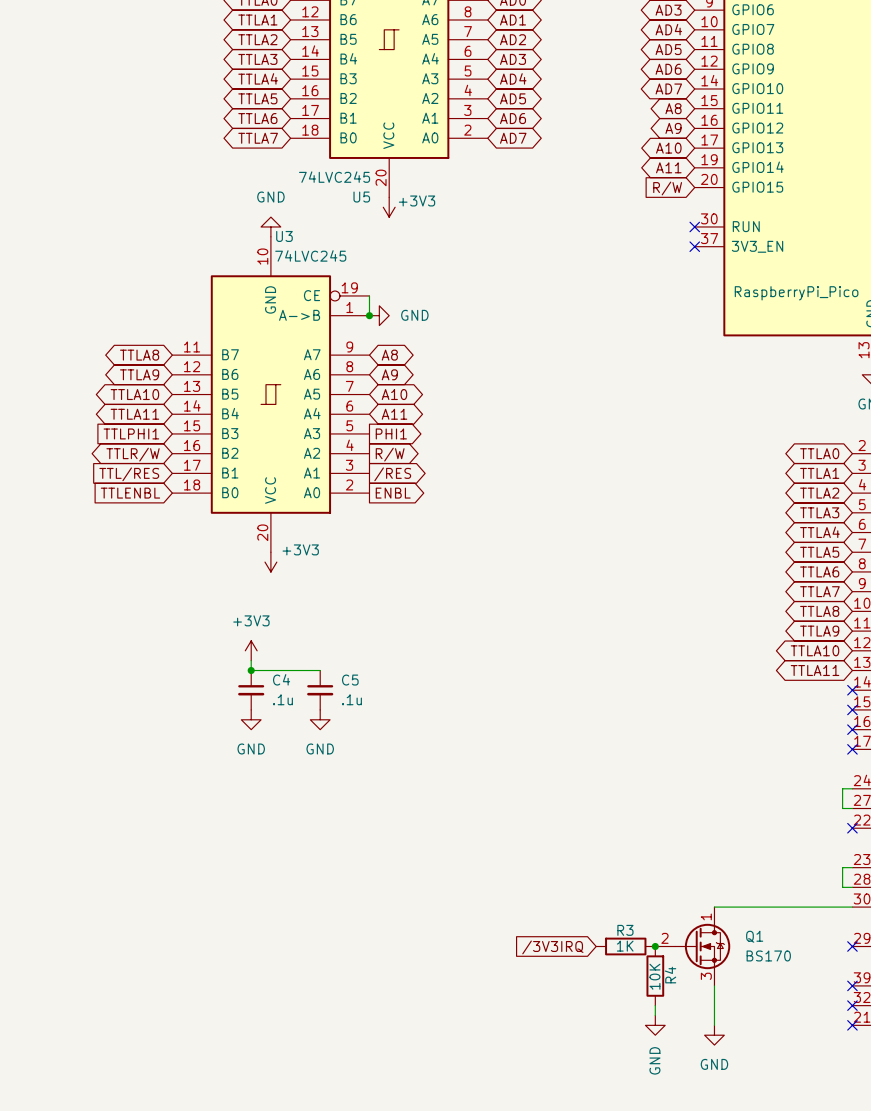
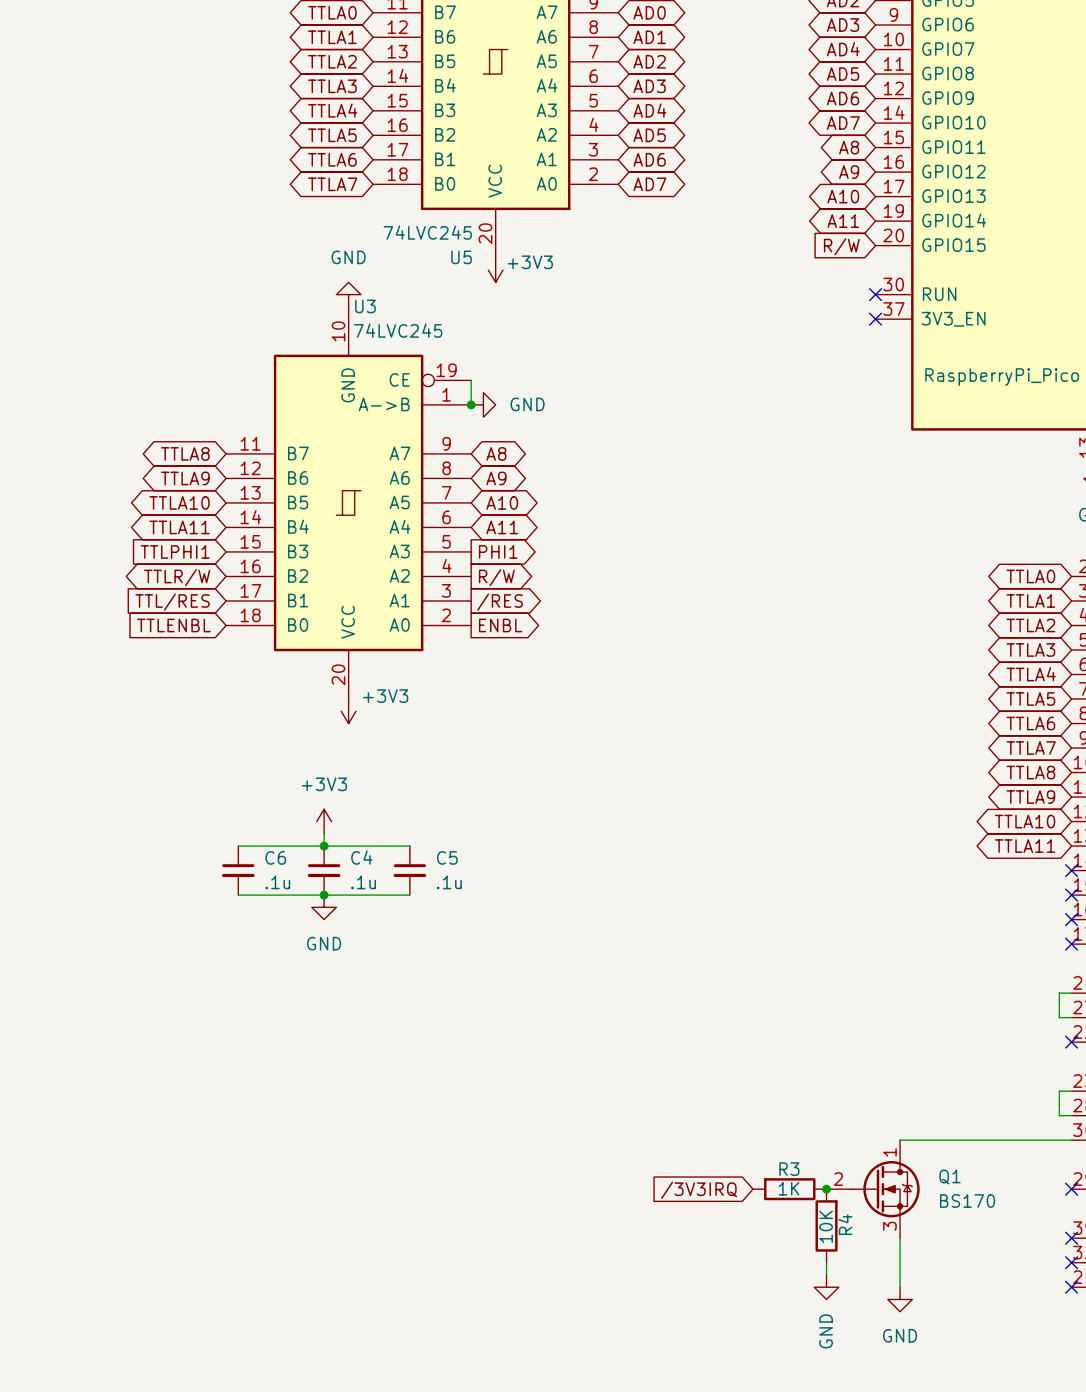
wire: none -> (238, 846) (324, 846)
C6: none -> .1u (238, 870)
wire: none -> (238, 895) (409, 895)
junction: none -> (324, 895)
power symbol: GND (320, 719) -> none

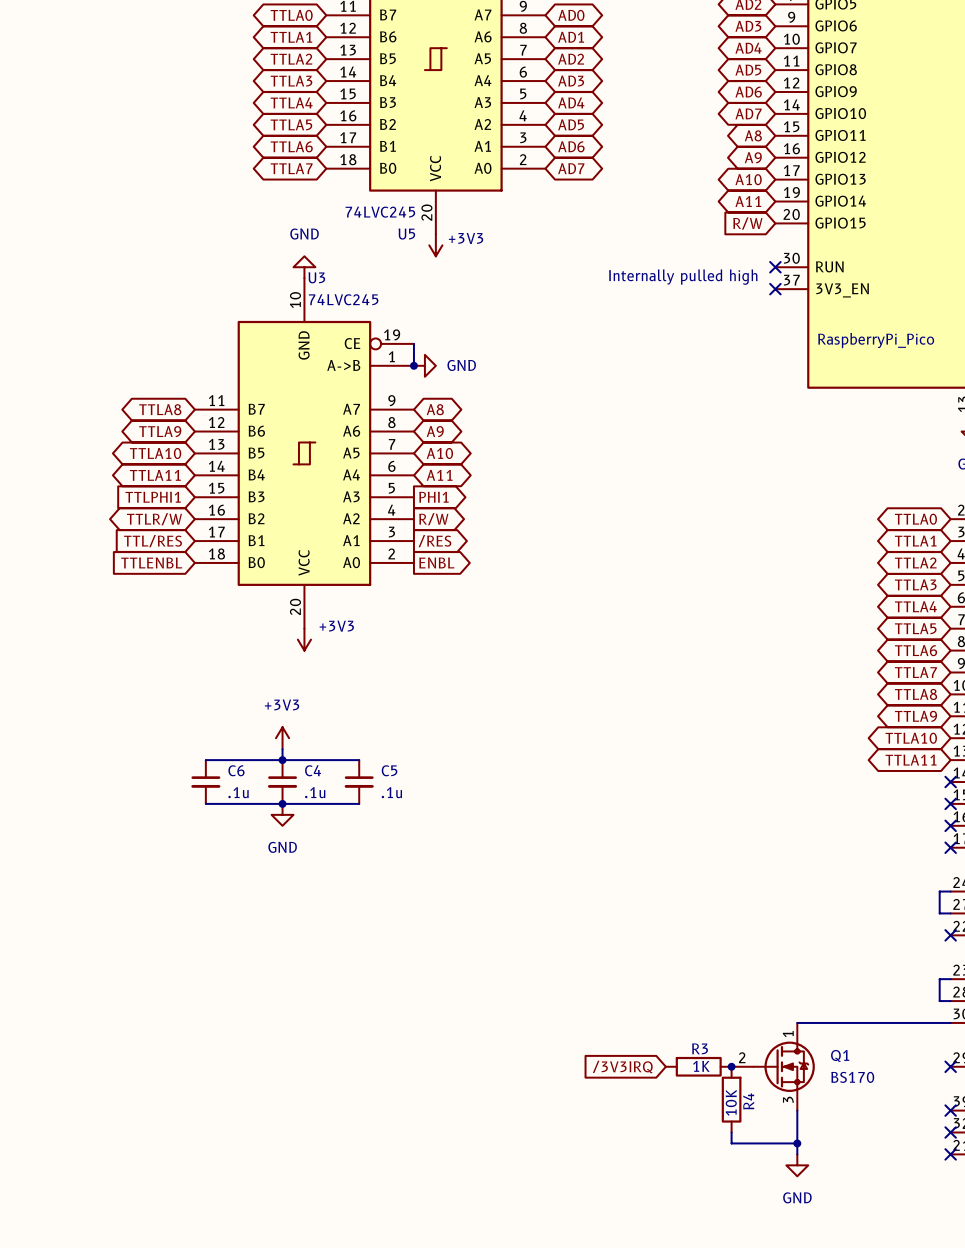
text: none -> Internally pulled high (683, 277)
wire: none -> (731, 1143) (797, 1143)
junction: none -> (797, 1143)
power symbol: GND (826, 1287) -> none

